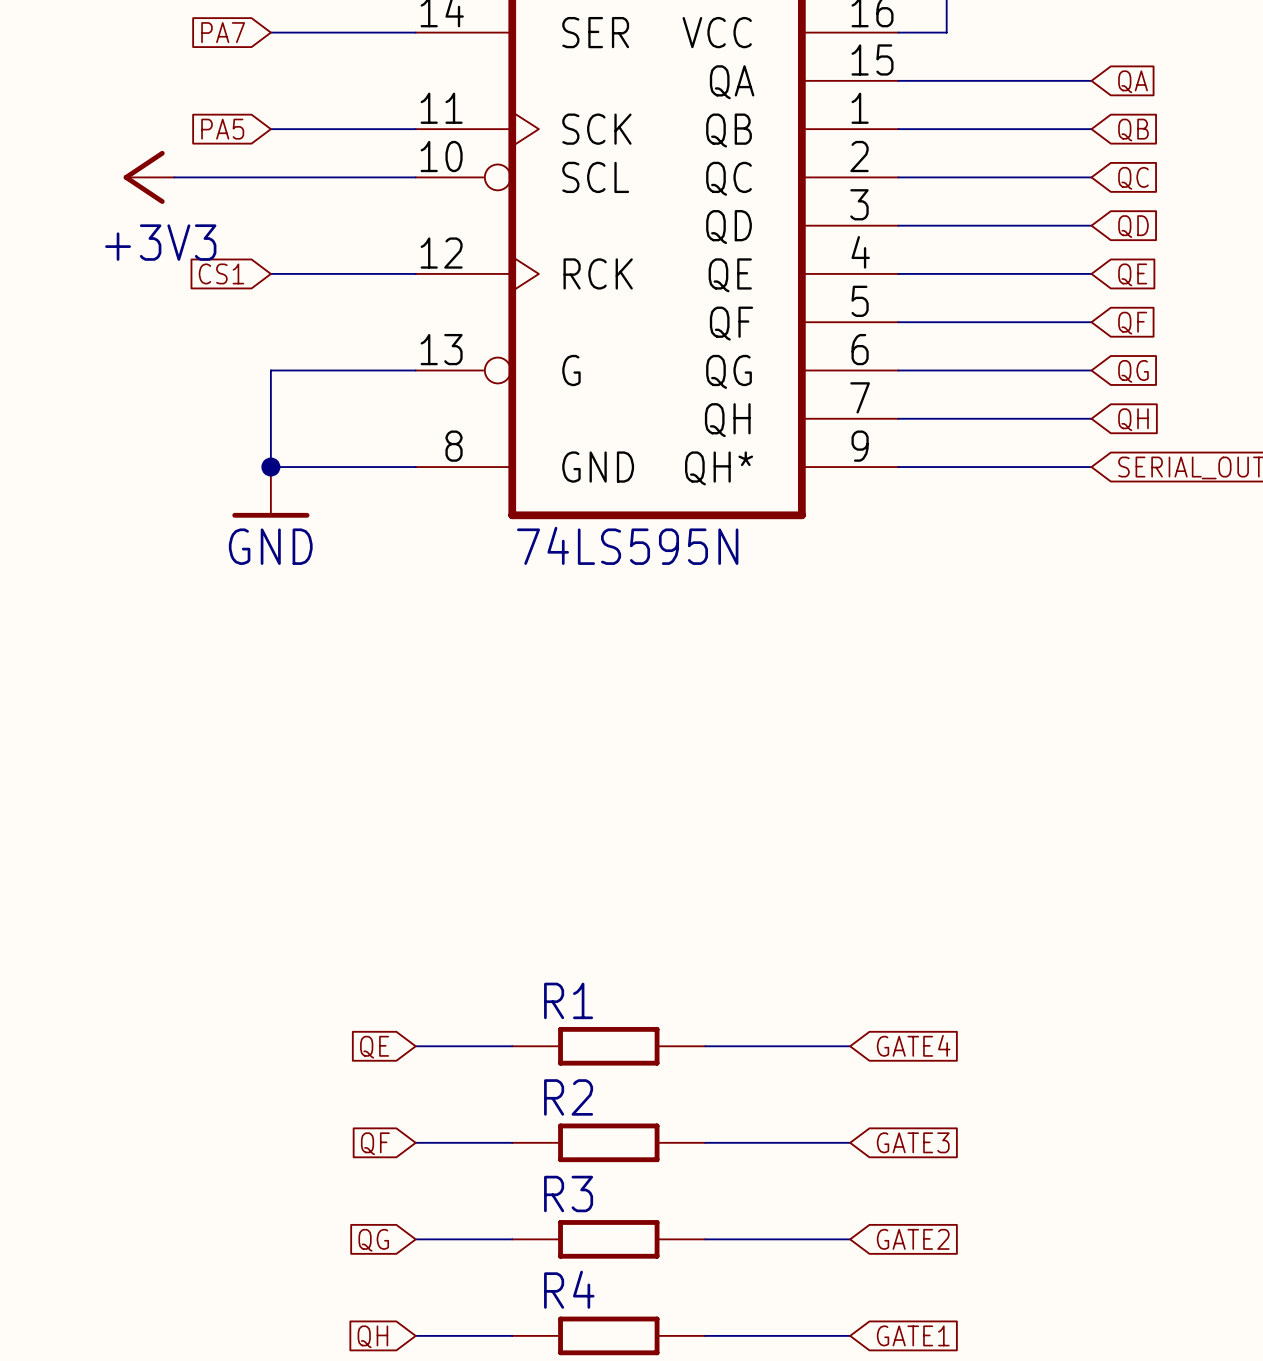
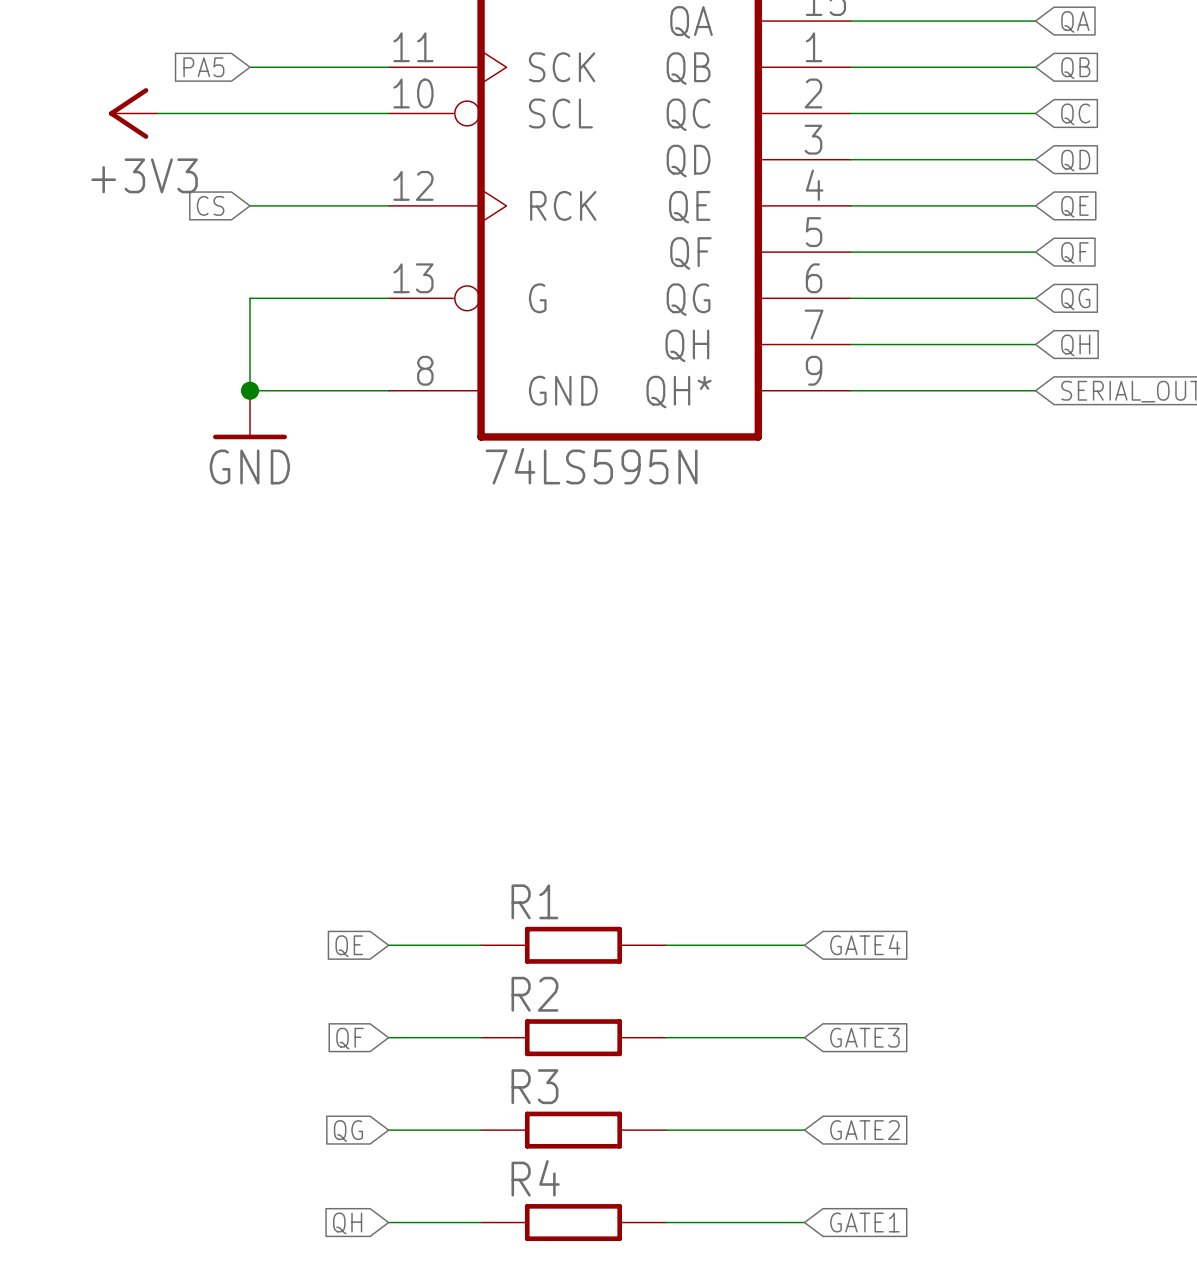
global label: CS1 (221, 273) -> CS (210, 205)

